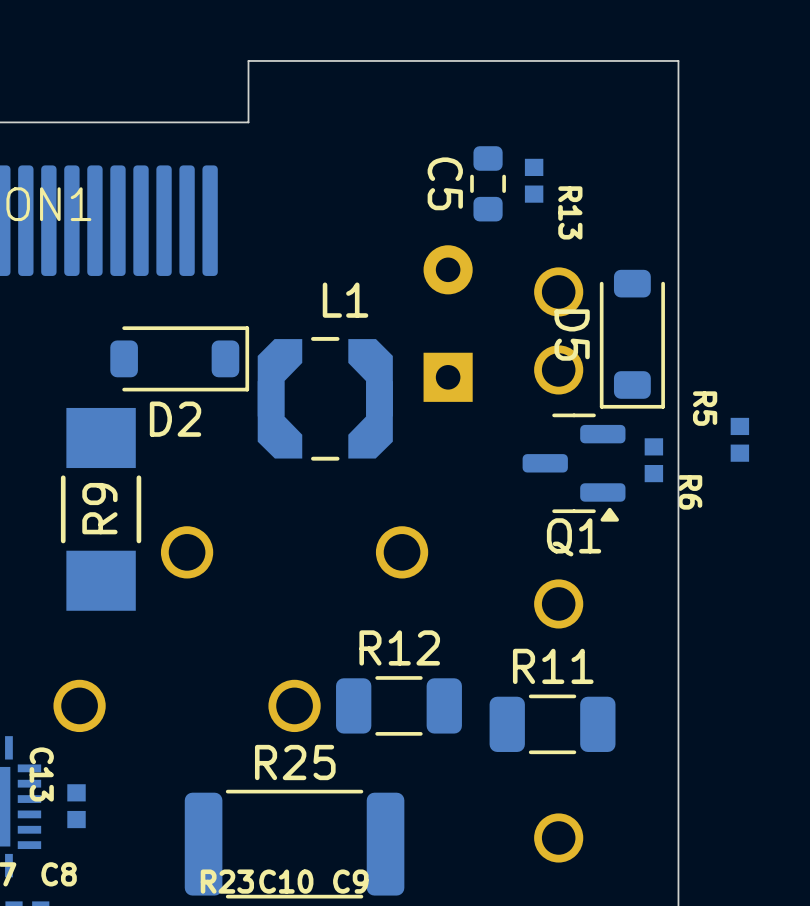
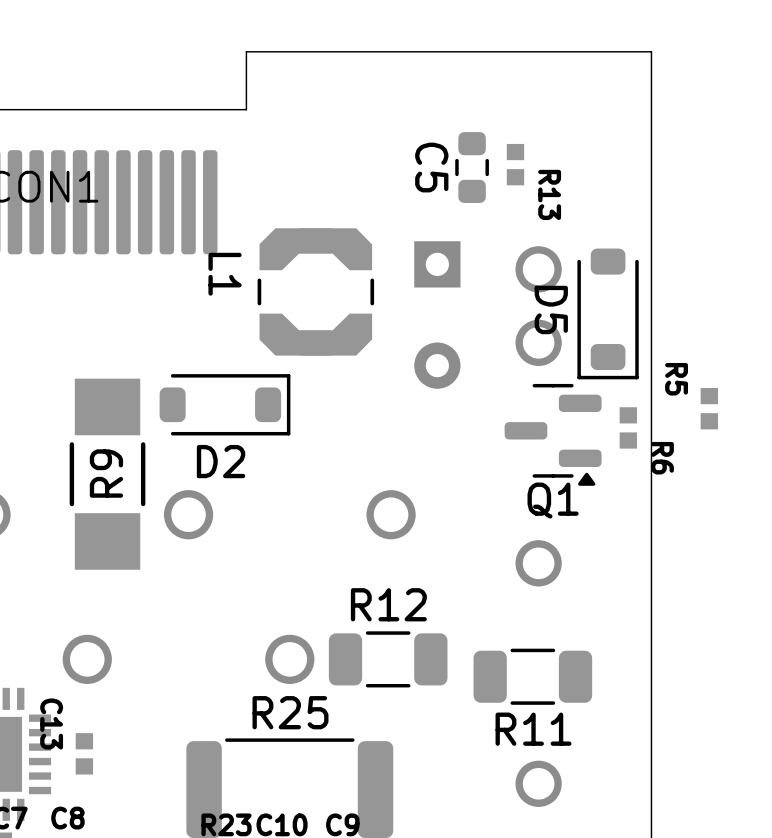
L1 name position: L1 (345, 300) -> L1 (225, 274)
part rotation: 0° (448, 323) -> 180° (437, 315)
D2 position: (179, 358) -> (224, 404)
L1 rotation: 0° (325, 398) -> 90° clockwise (315, 291)
L1 position: (325, 398) -> (315, 291)
R11 name position: R11 (553, 666) -> R11 (533, 729)

